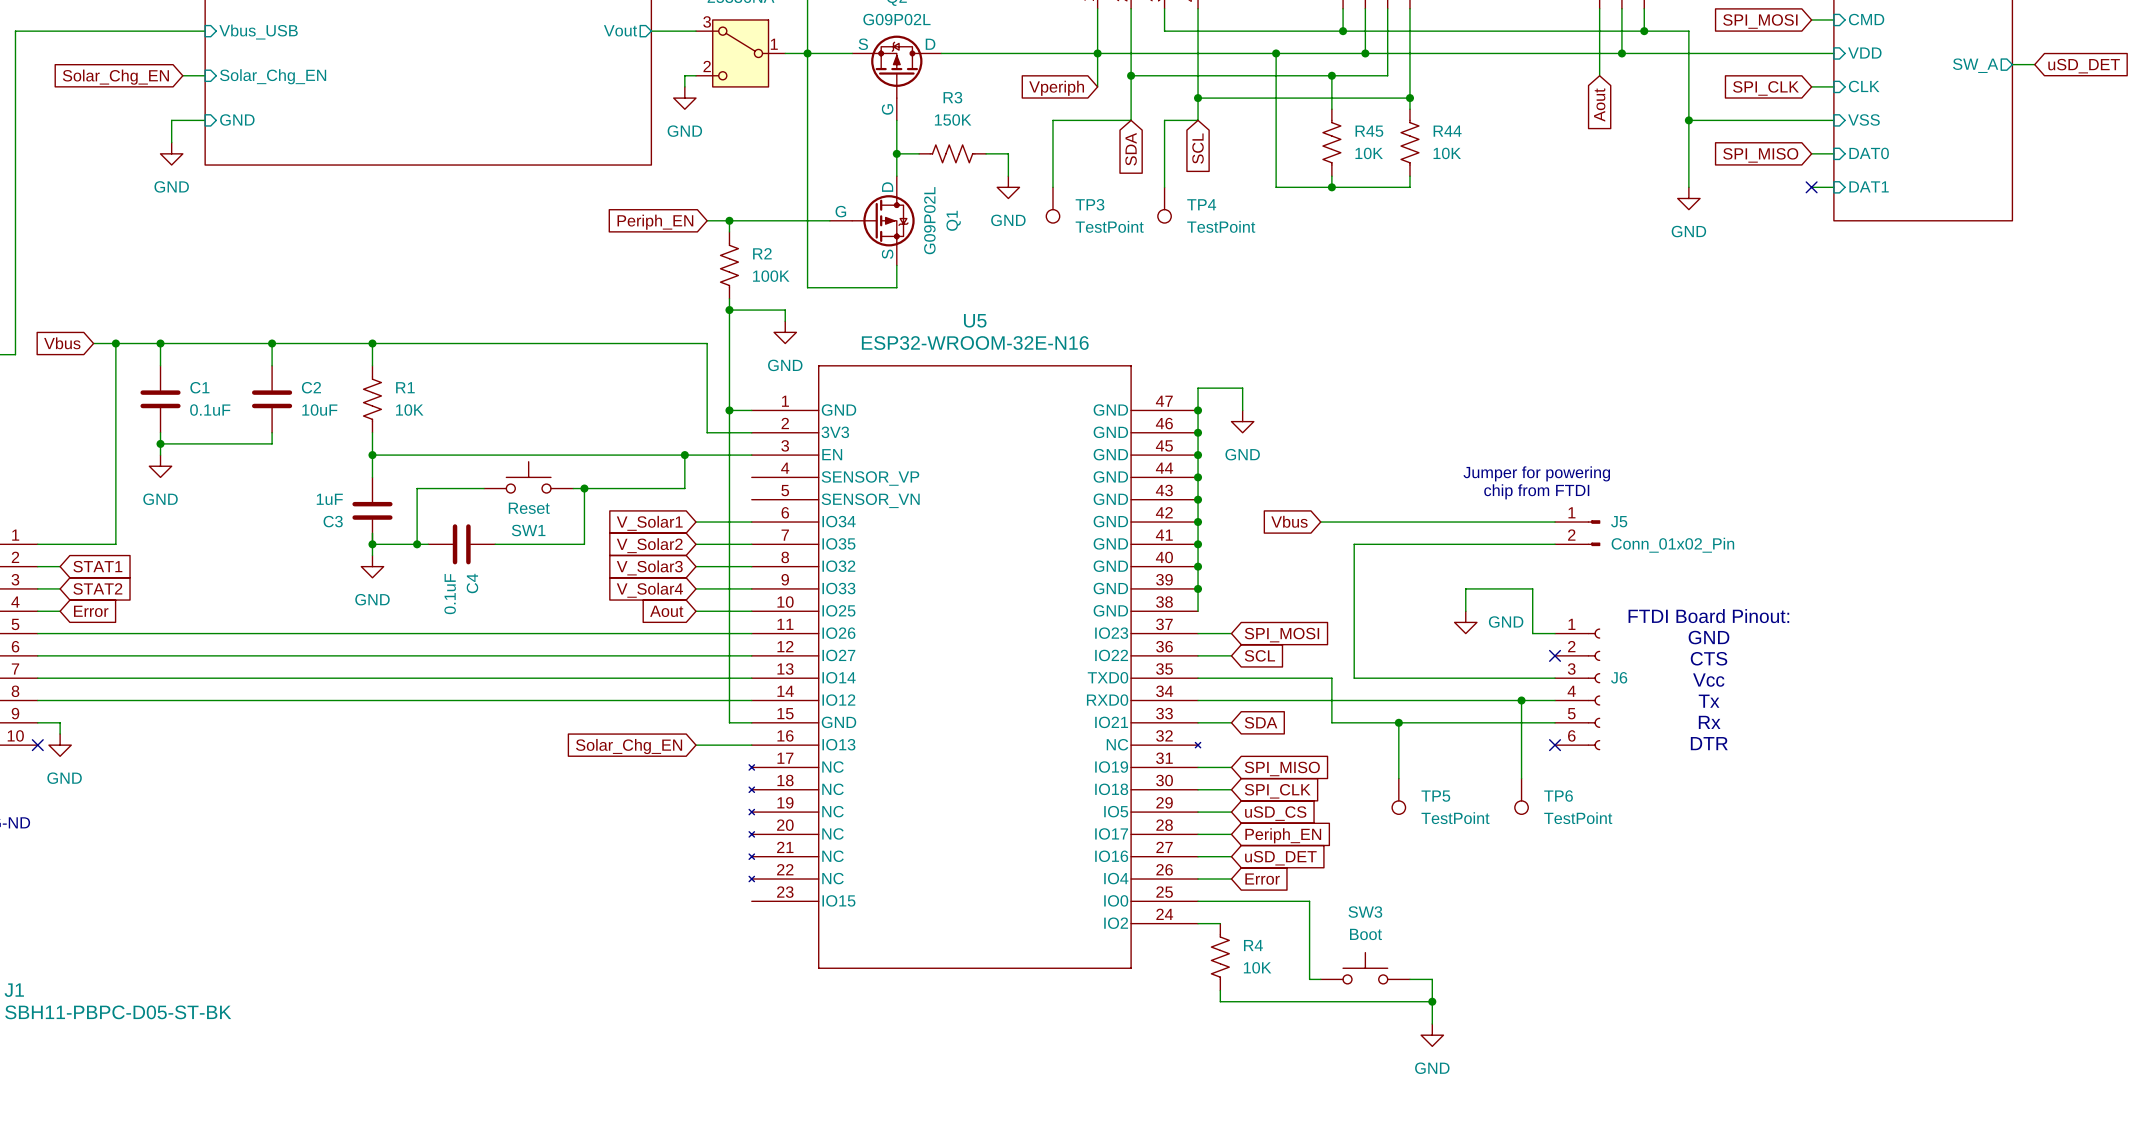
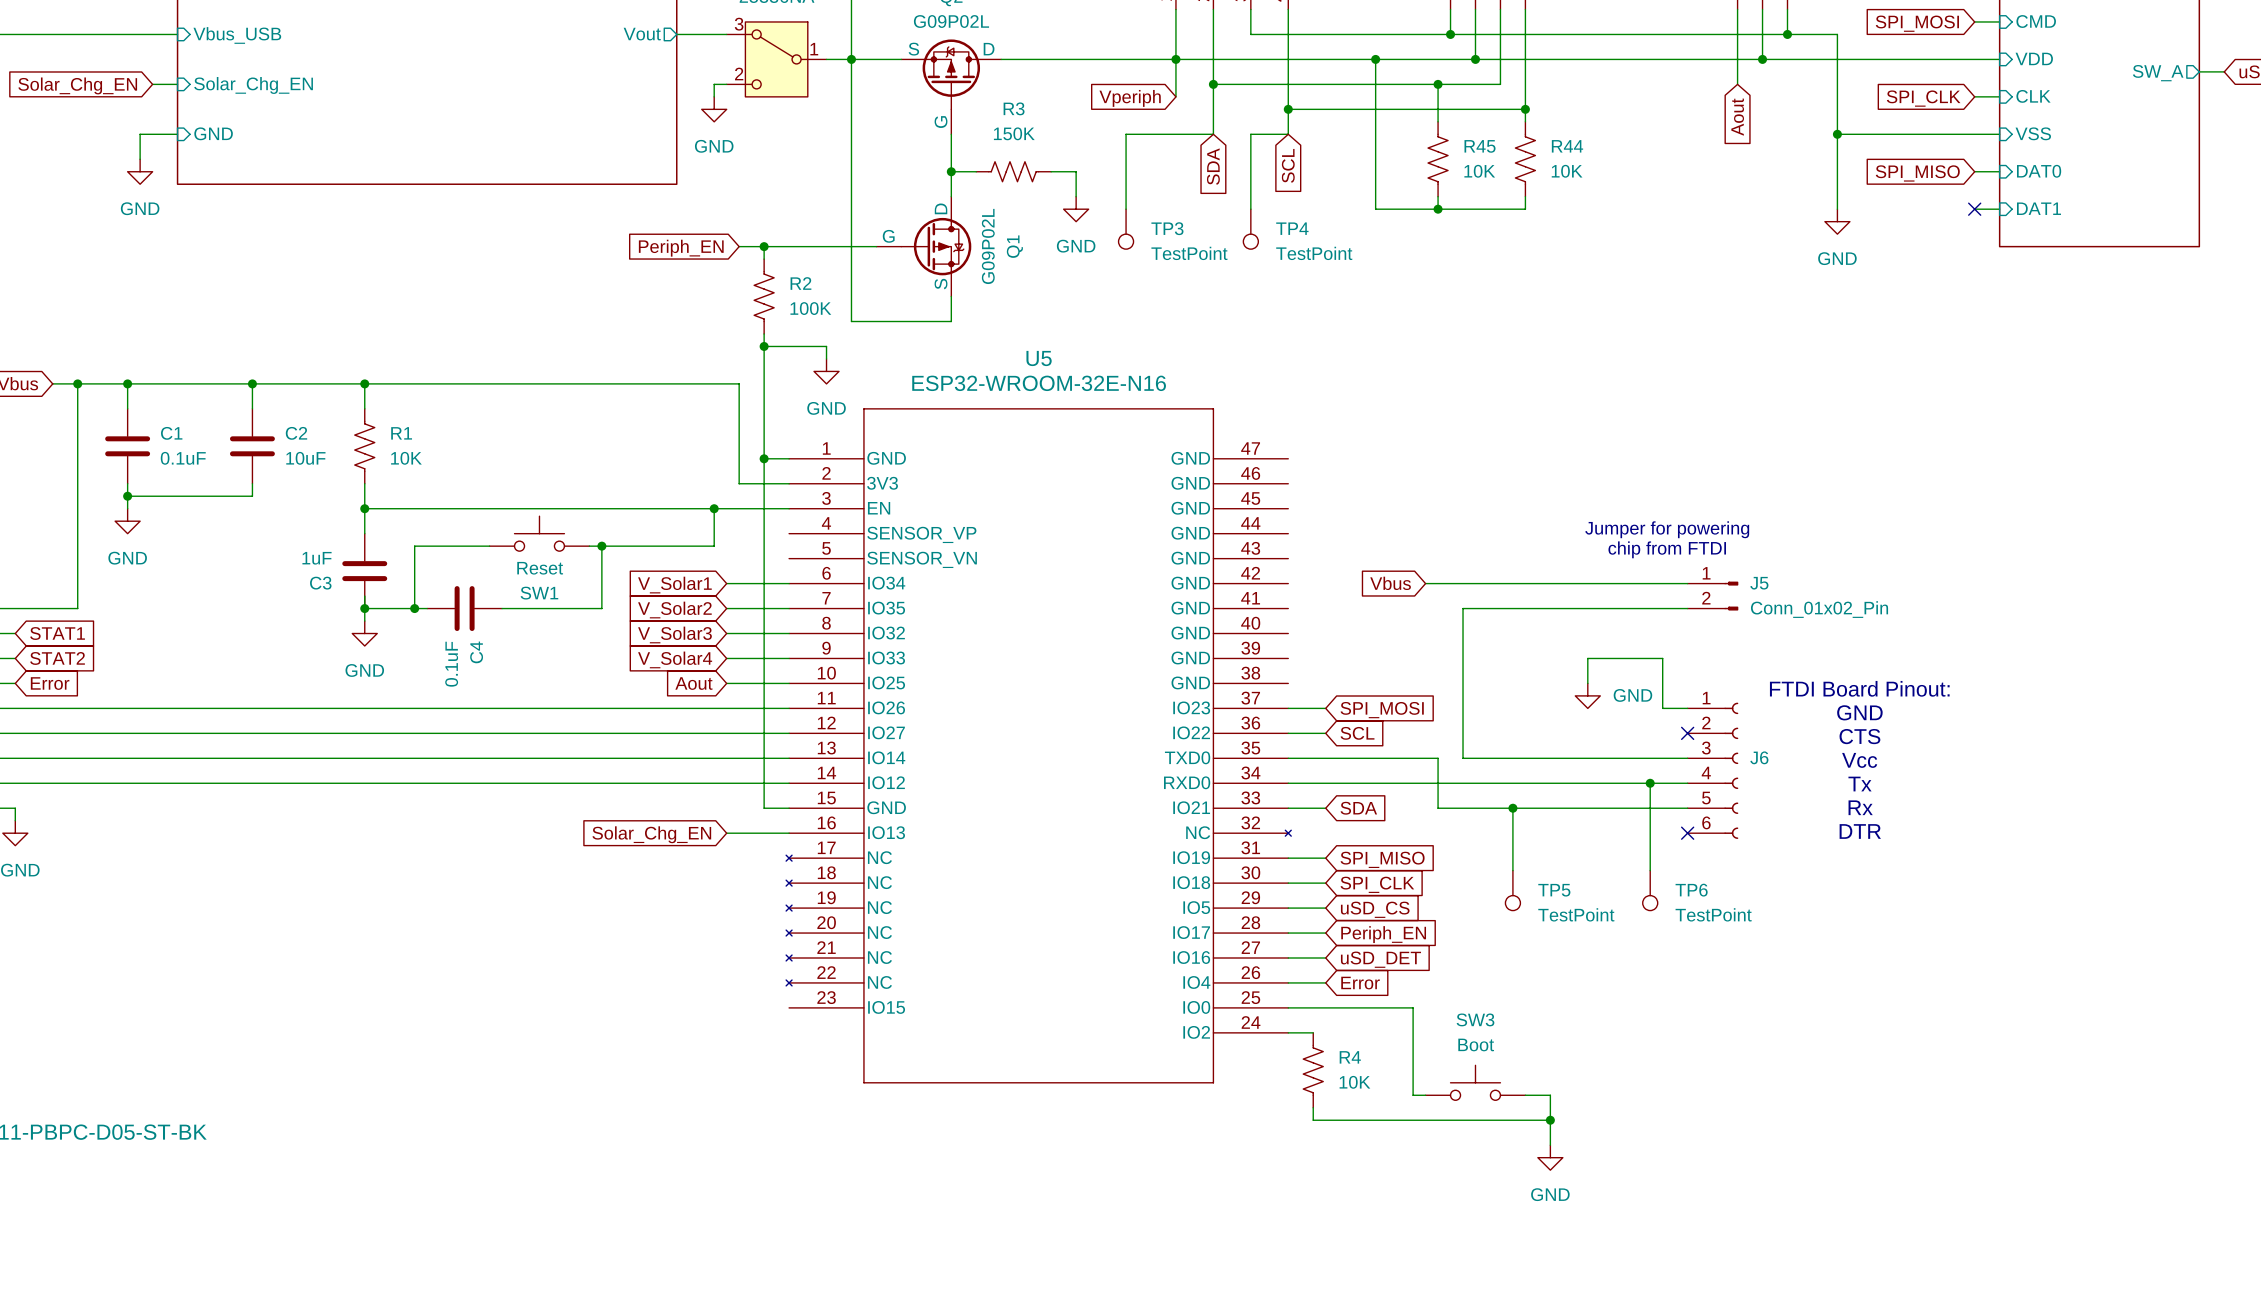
junction: (1198, 410) -> none
wire: (1242, 410) (1242, 388) (1198, 388) (1198, 611) -> none
power symbol: GND (1242, 421) -> none
junction: (1198, 432) -> none
junction: (1198, 455) -> none
junction: (1198, 477) -> none
junction: (1198, 499) -> none
junction: (1198, 522) -> none
junction: (1198, 544) -> none
junction: (1198, 566) -> none
junction: (1198, 588) -> none

